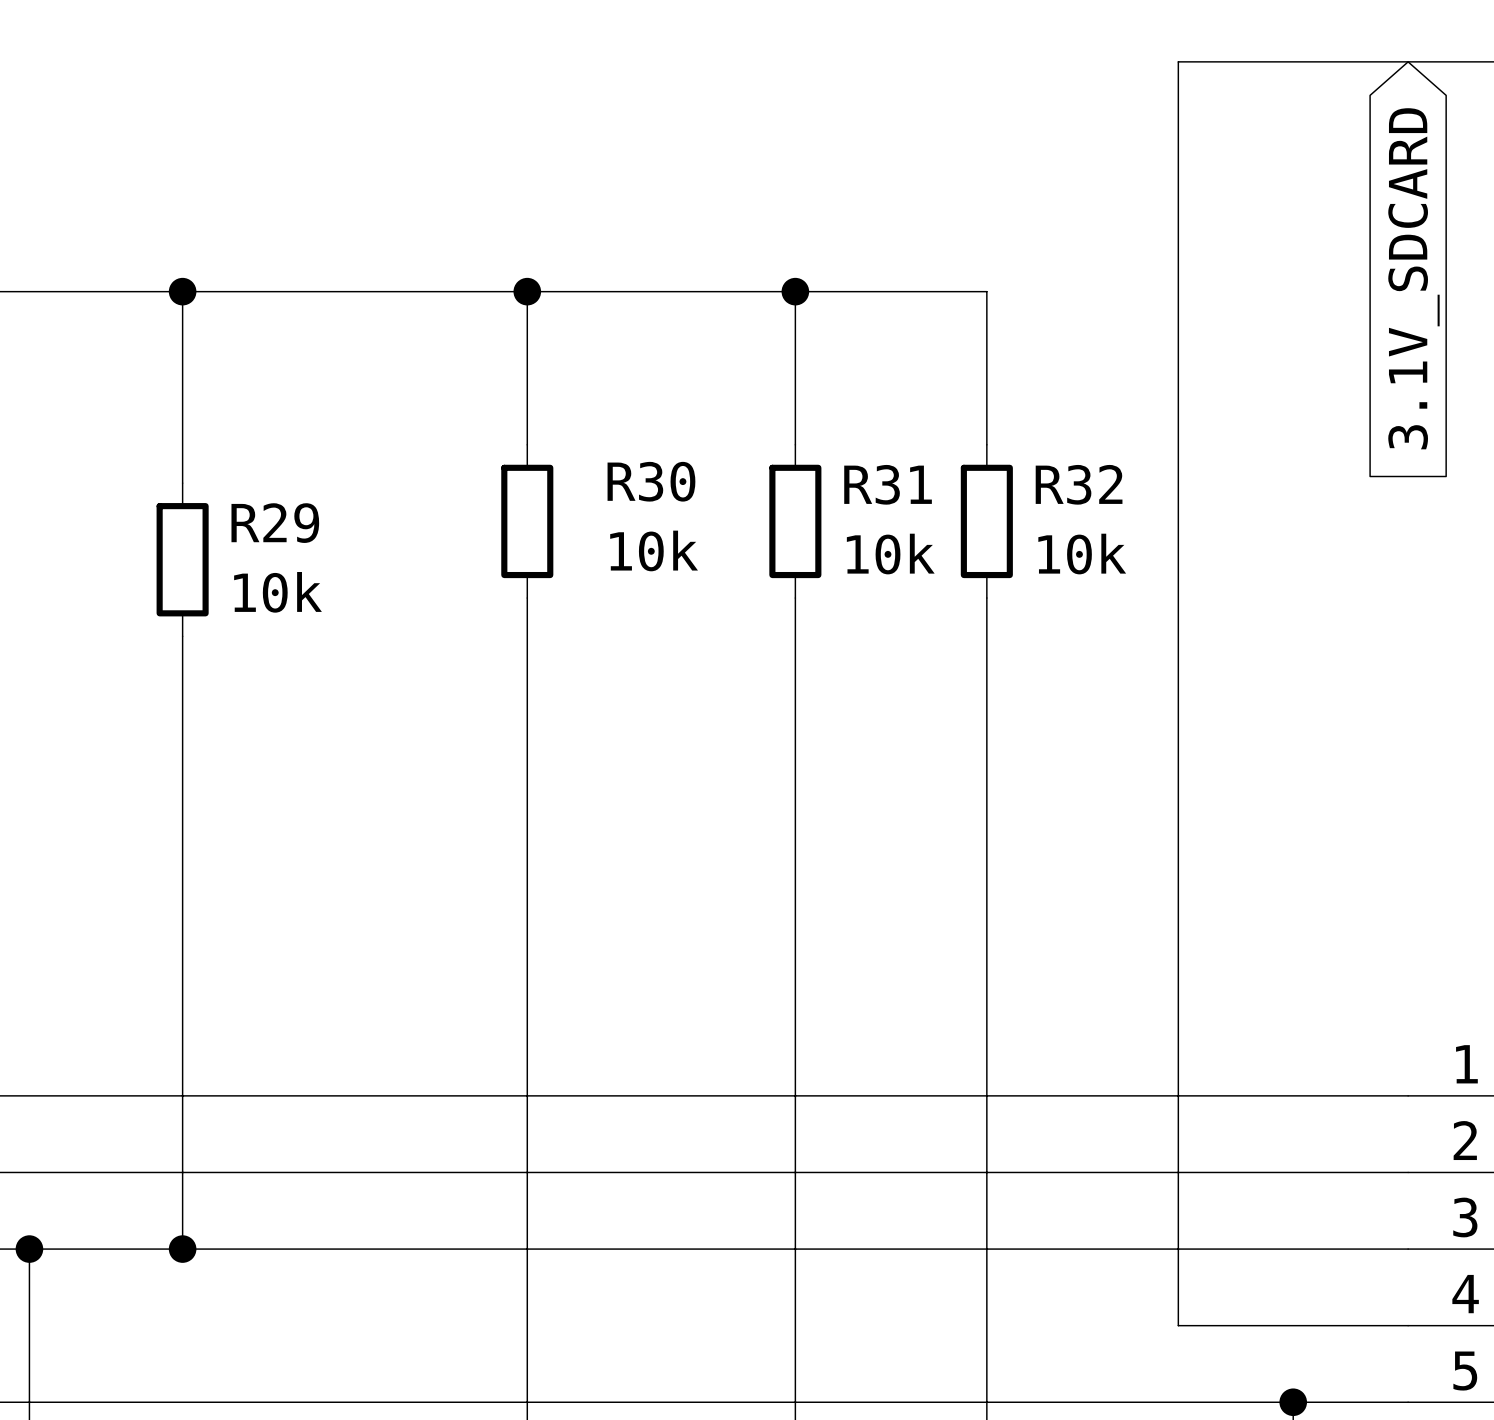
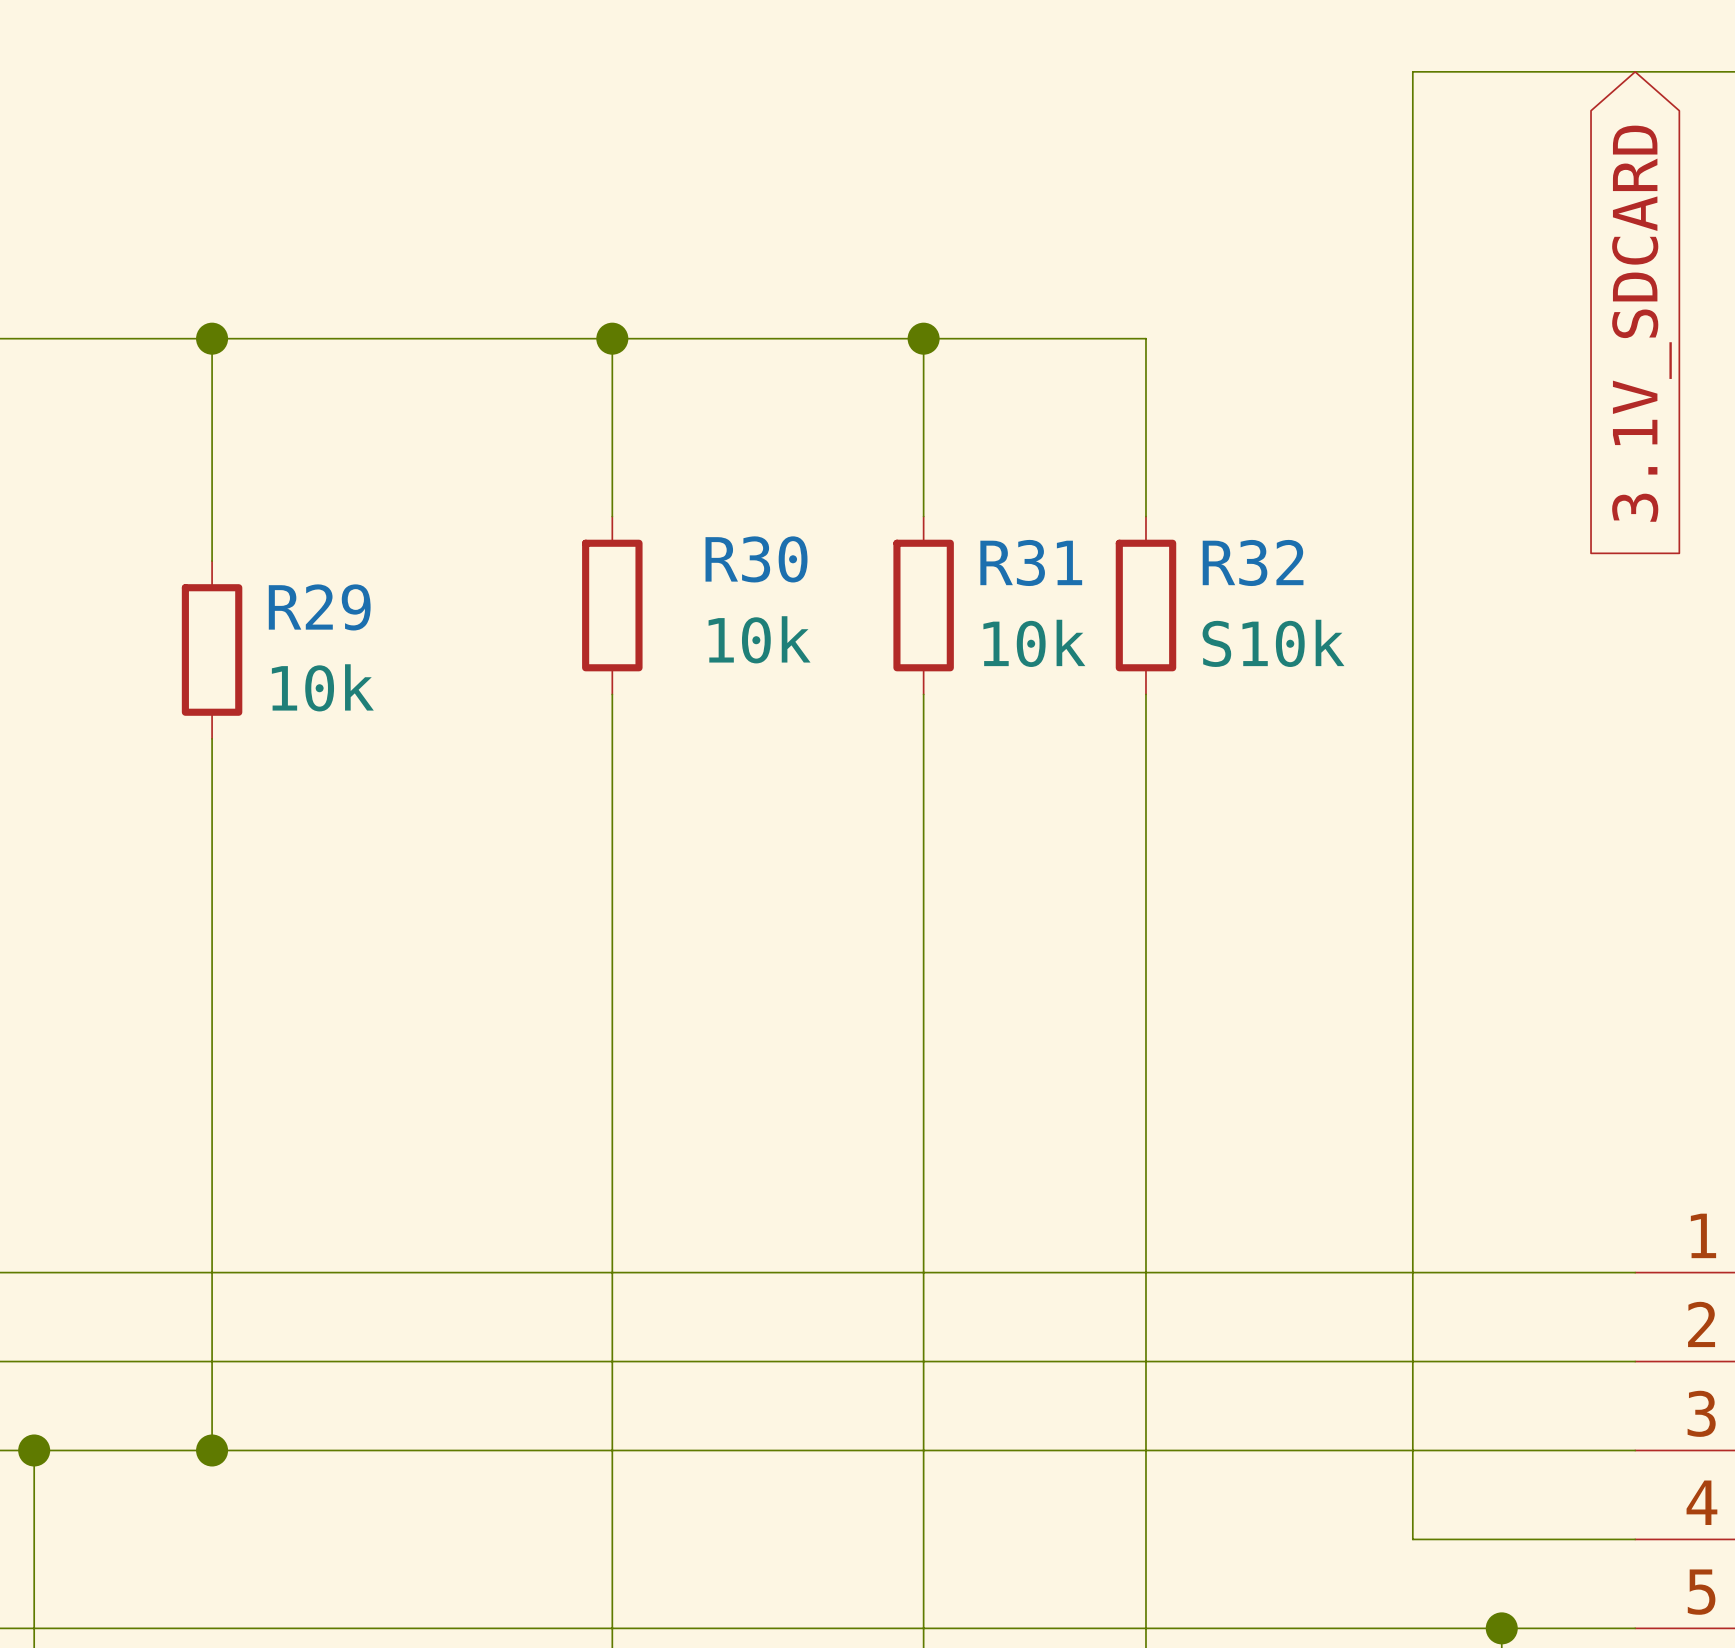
wire: (1216, 61) (1178, 61) (1178, 1325) (1216, 1325) -> (1412, 71) (1412, 1539)
R32 value: 10k (1082, 554) -> S10k (1273, 643)

